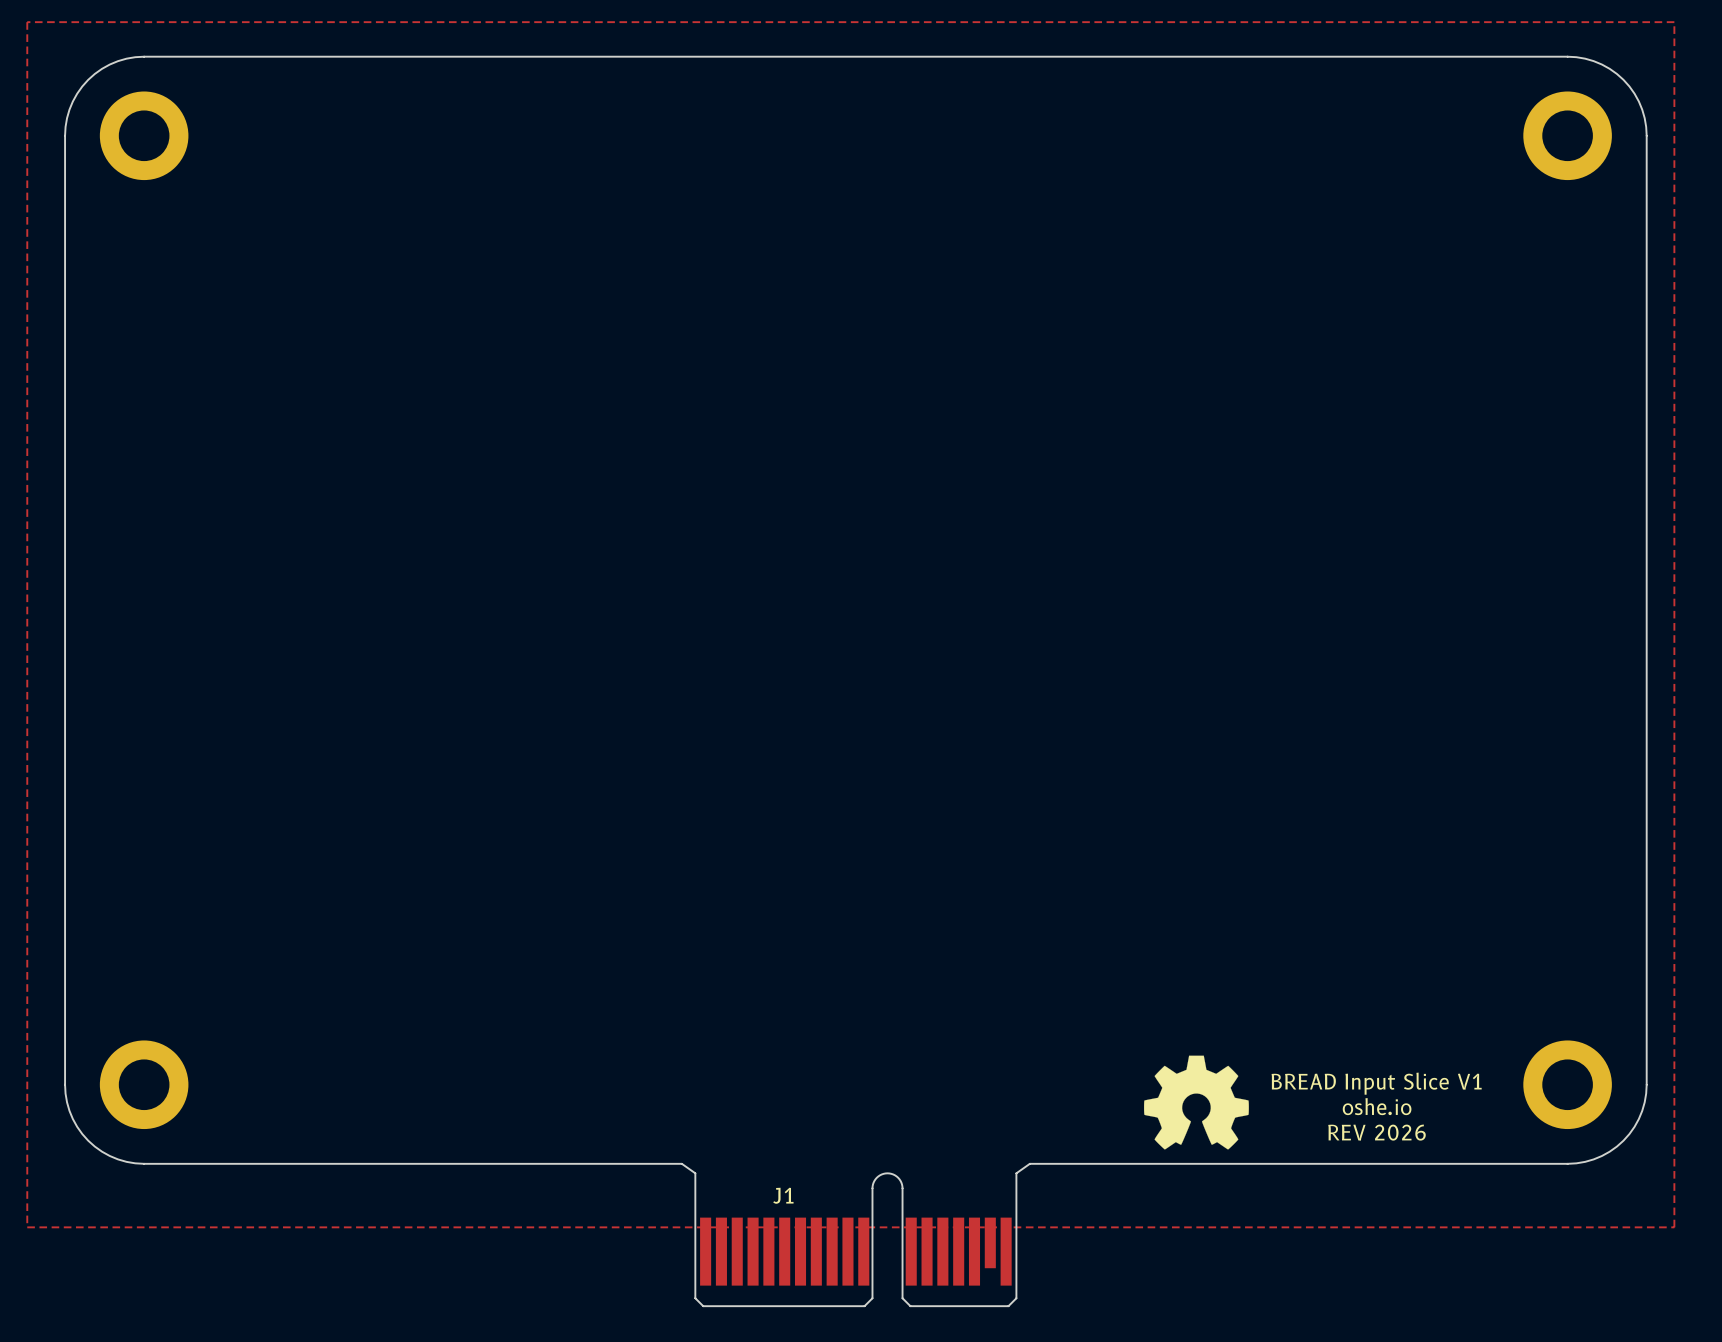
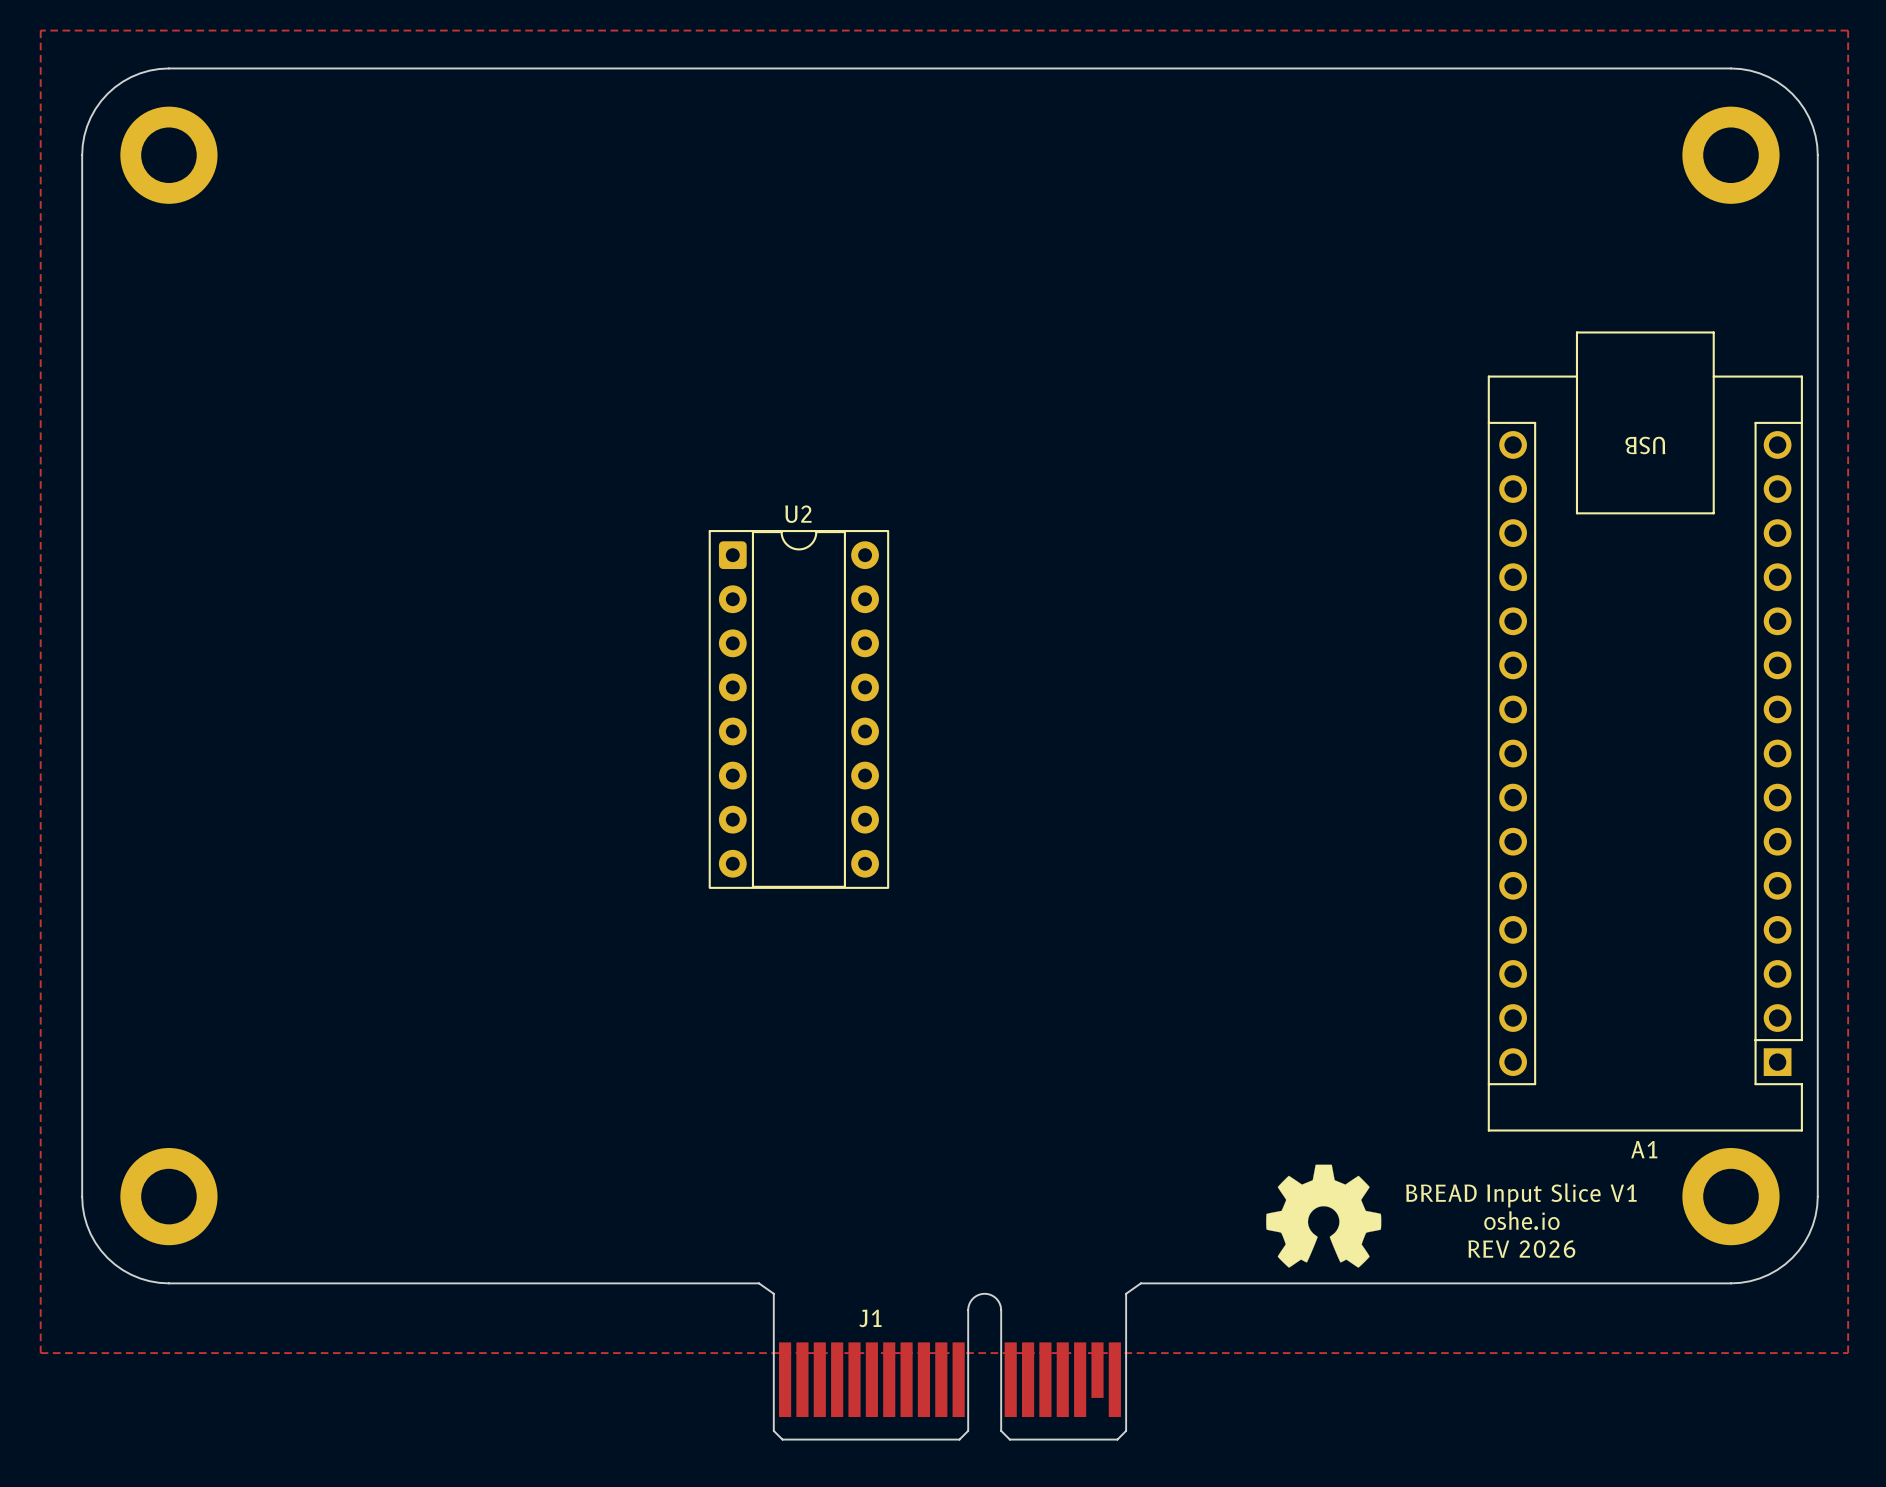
U2: none -> (798, 709)
A1: none -> (1645, 731)

